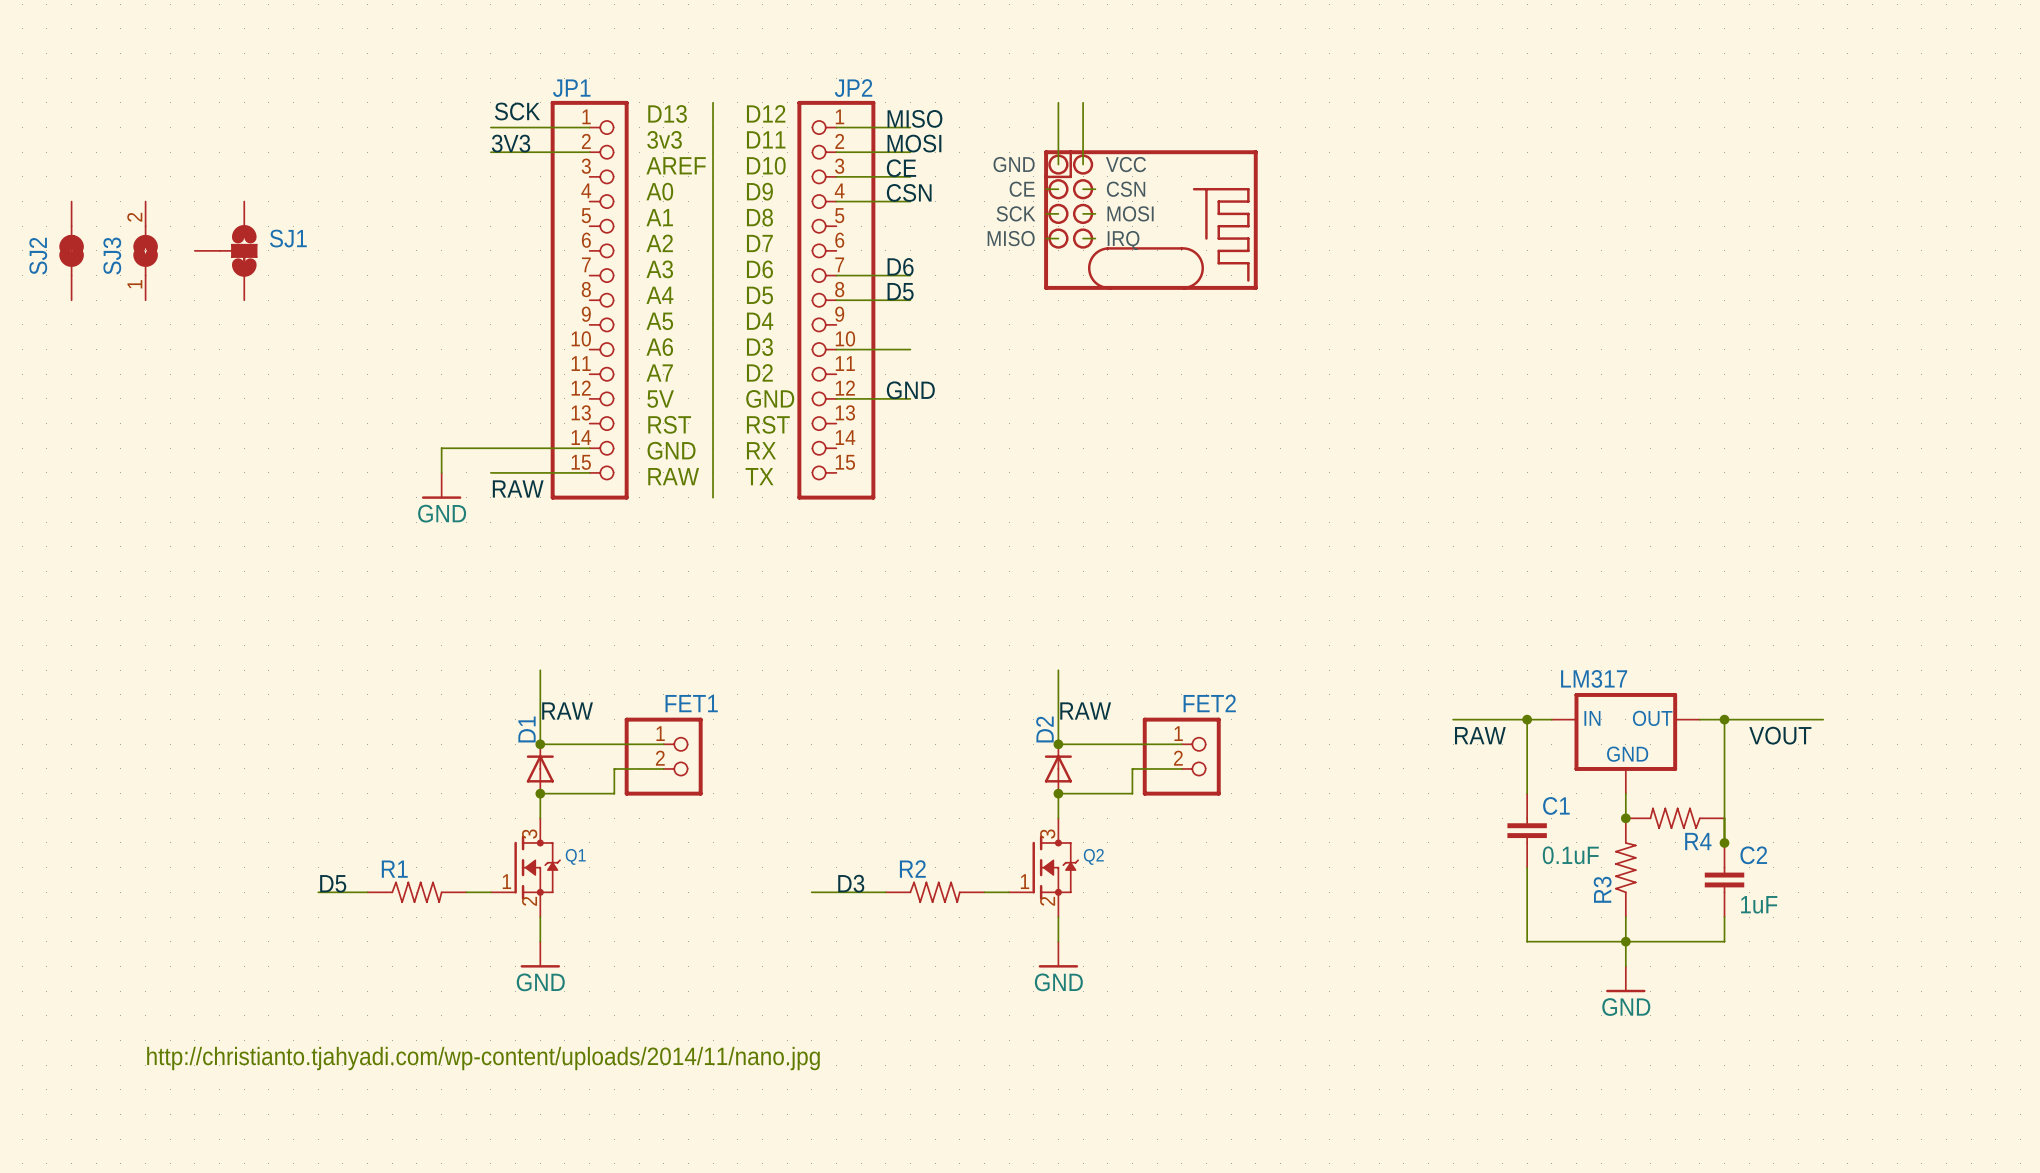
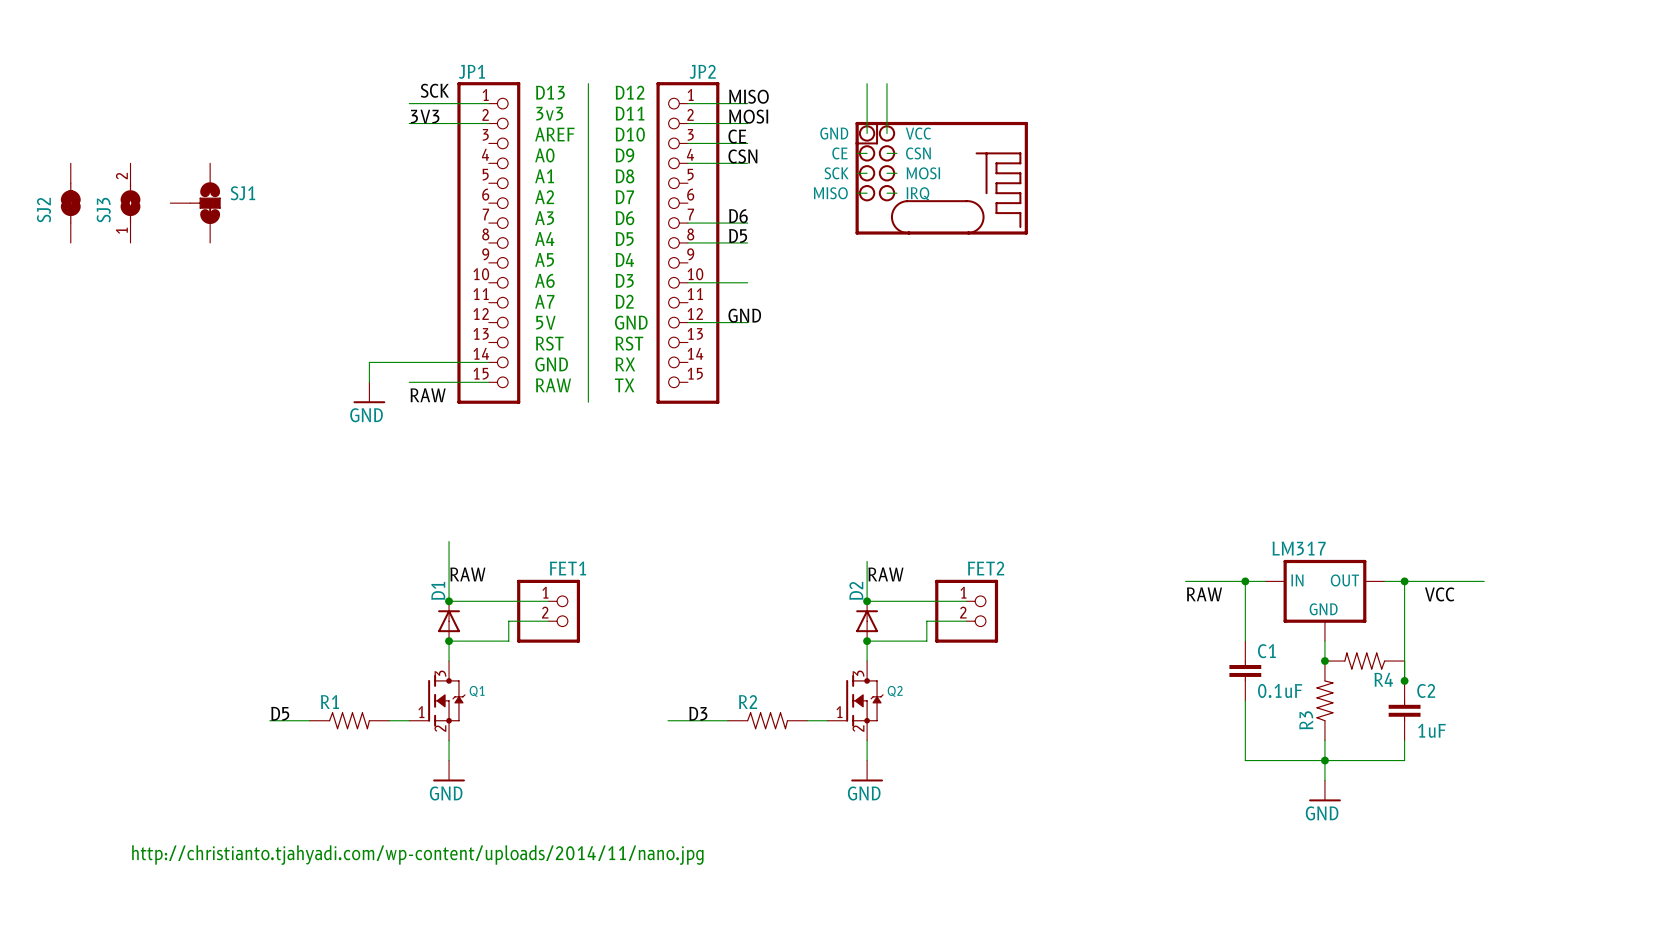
wire: (1058, 670) (1058, 694) -> none
label: VOUT (1780, 735) -> VCC (1439, 594)

